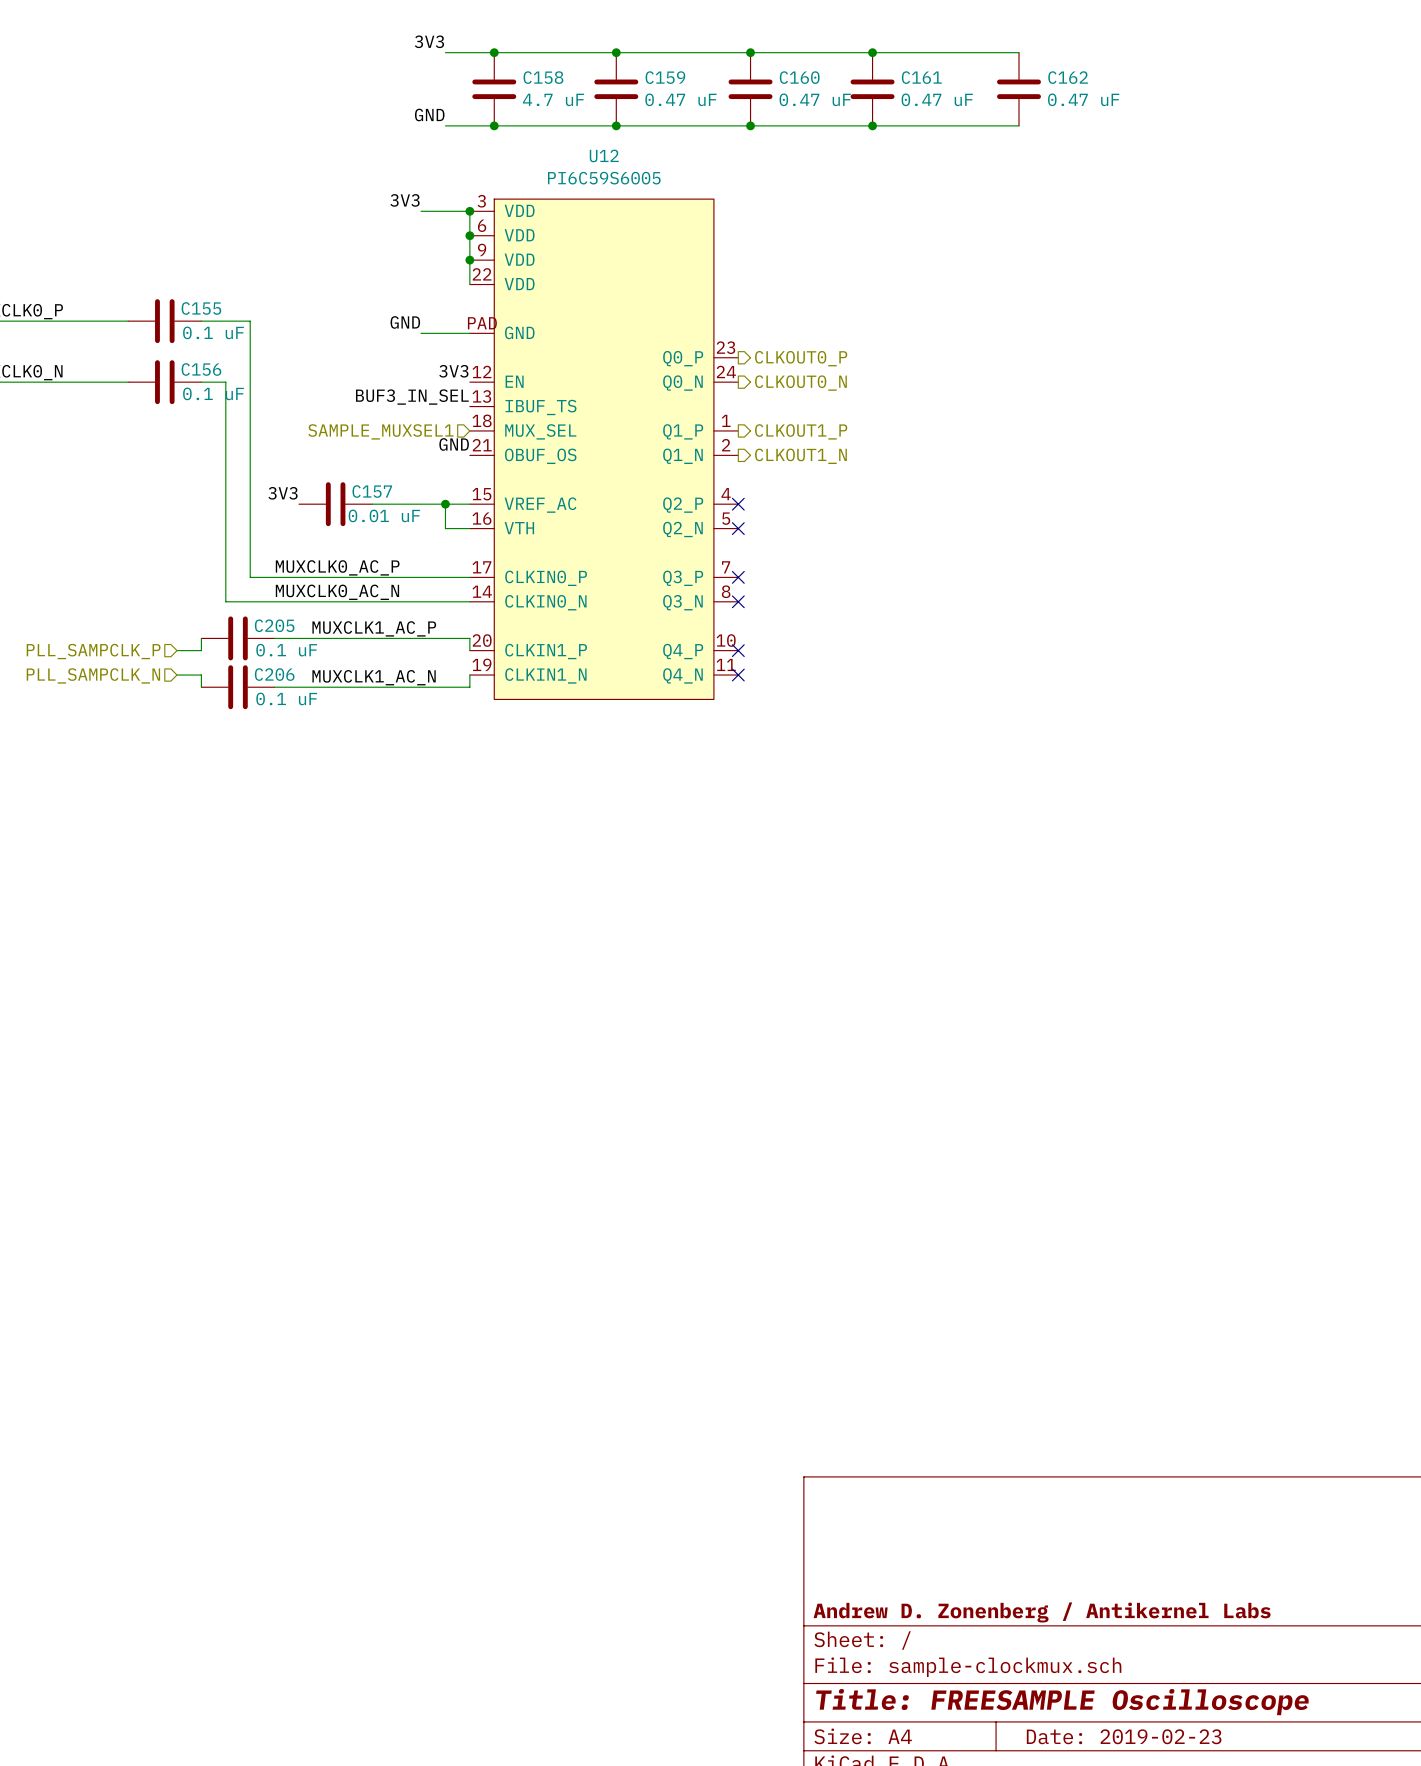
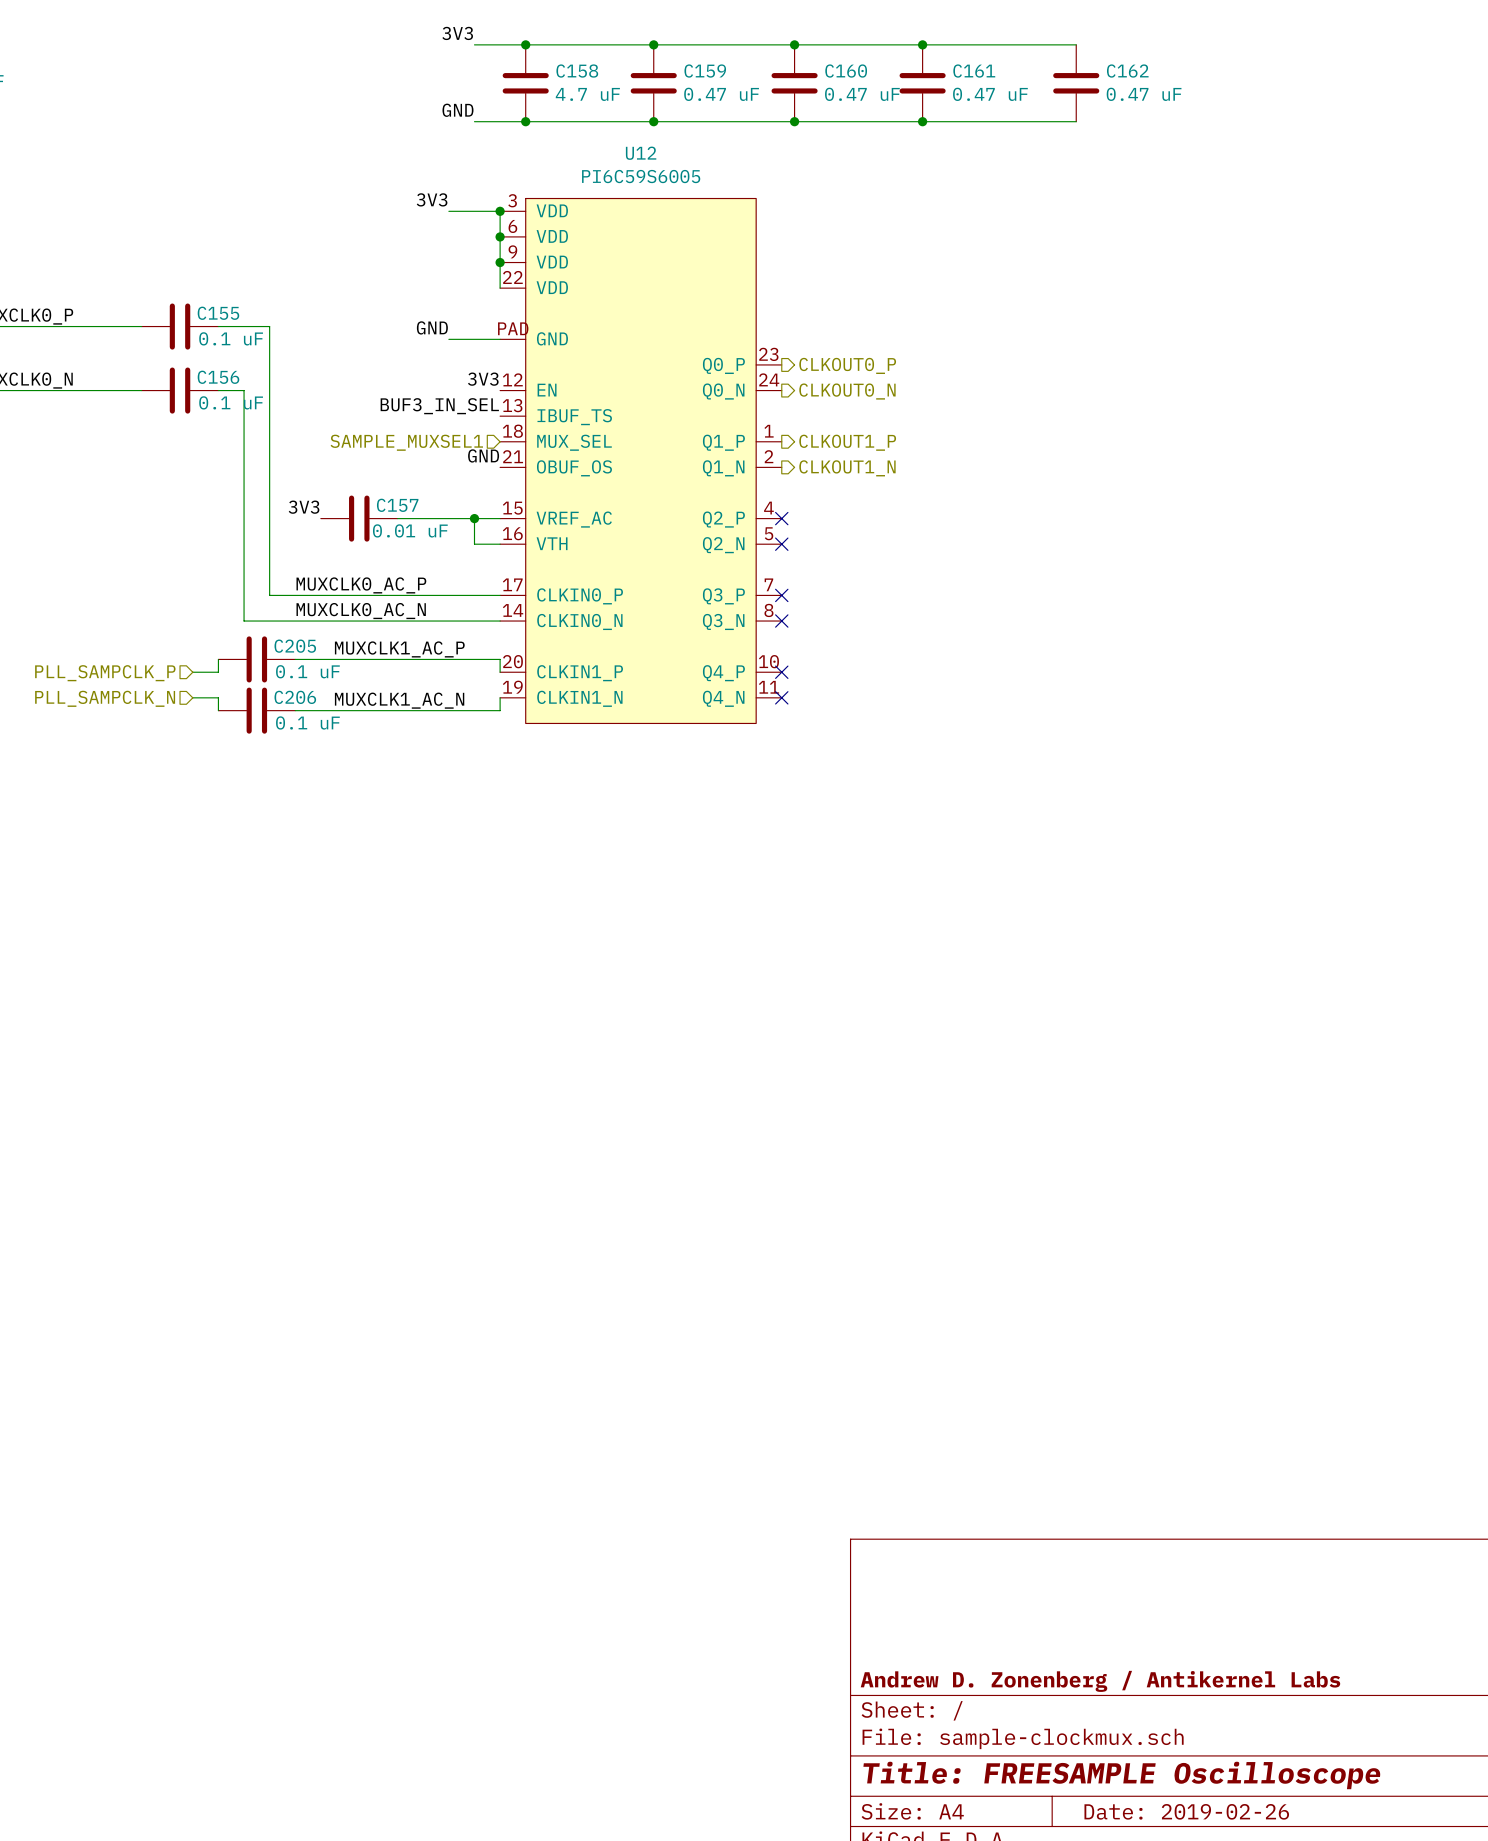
title block: Date: 2019-02-23 (1124, 1736) -> Date: 2019-02-26 (1186, 1811)

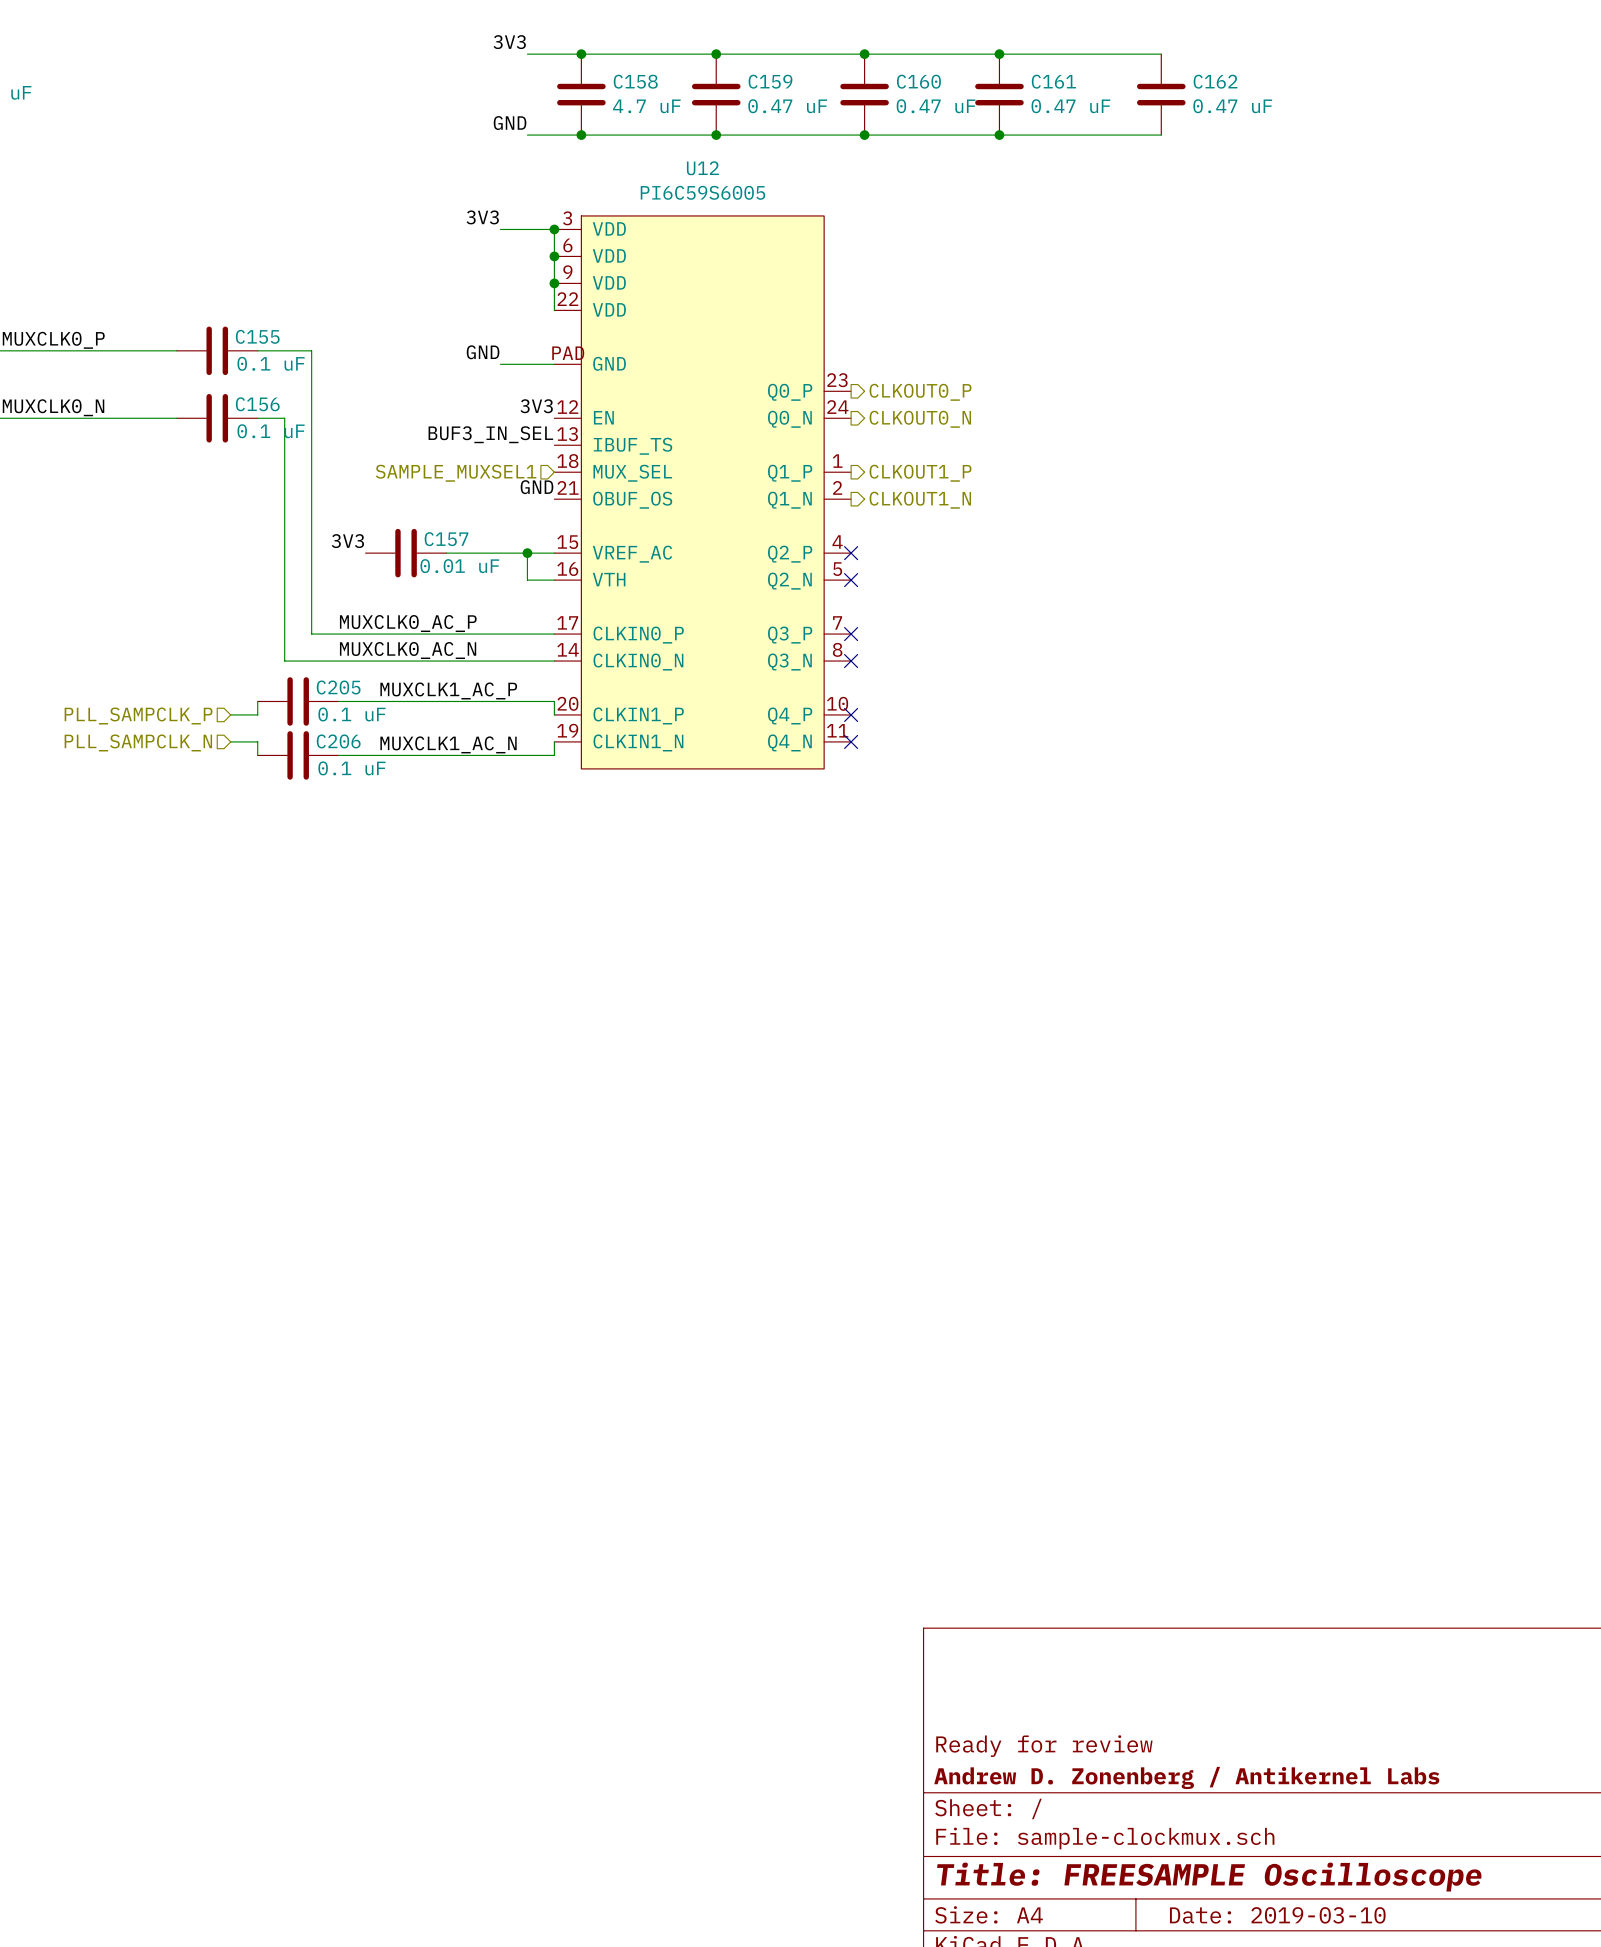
title block: none -> Ready for review (1044, 1746)
title block: Date: 2019-02-26 (1186, 1811) -> Date: 2019-03-10 (1277, 1915)

